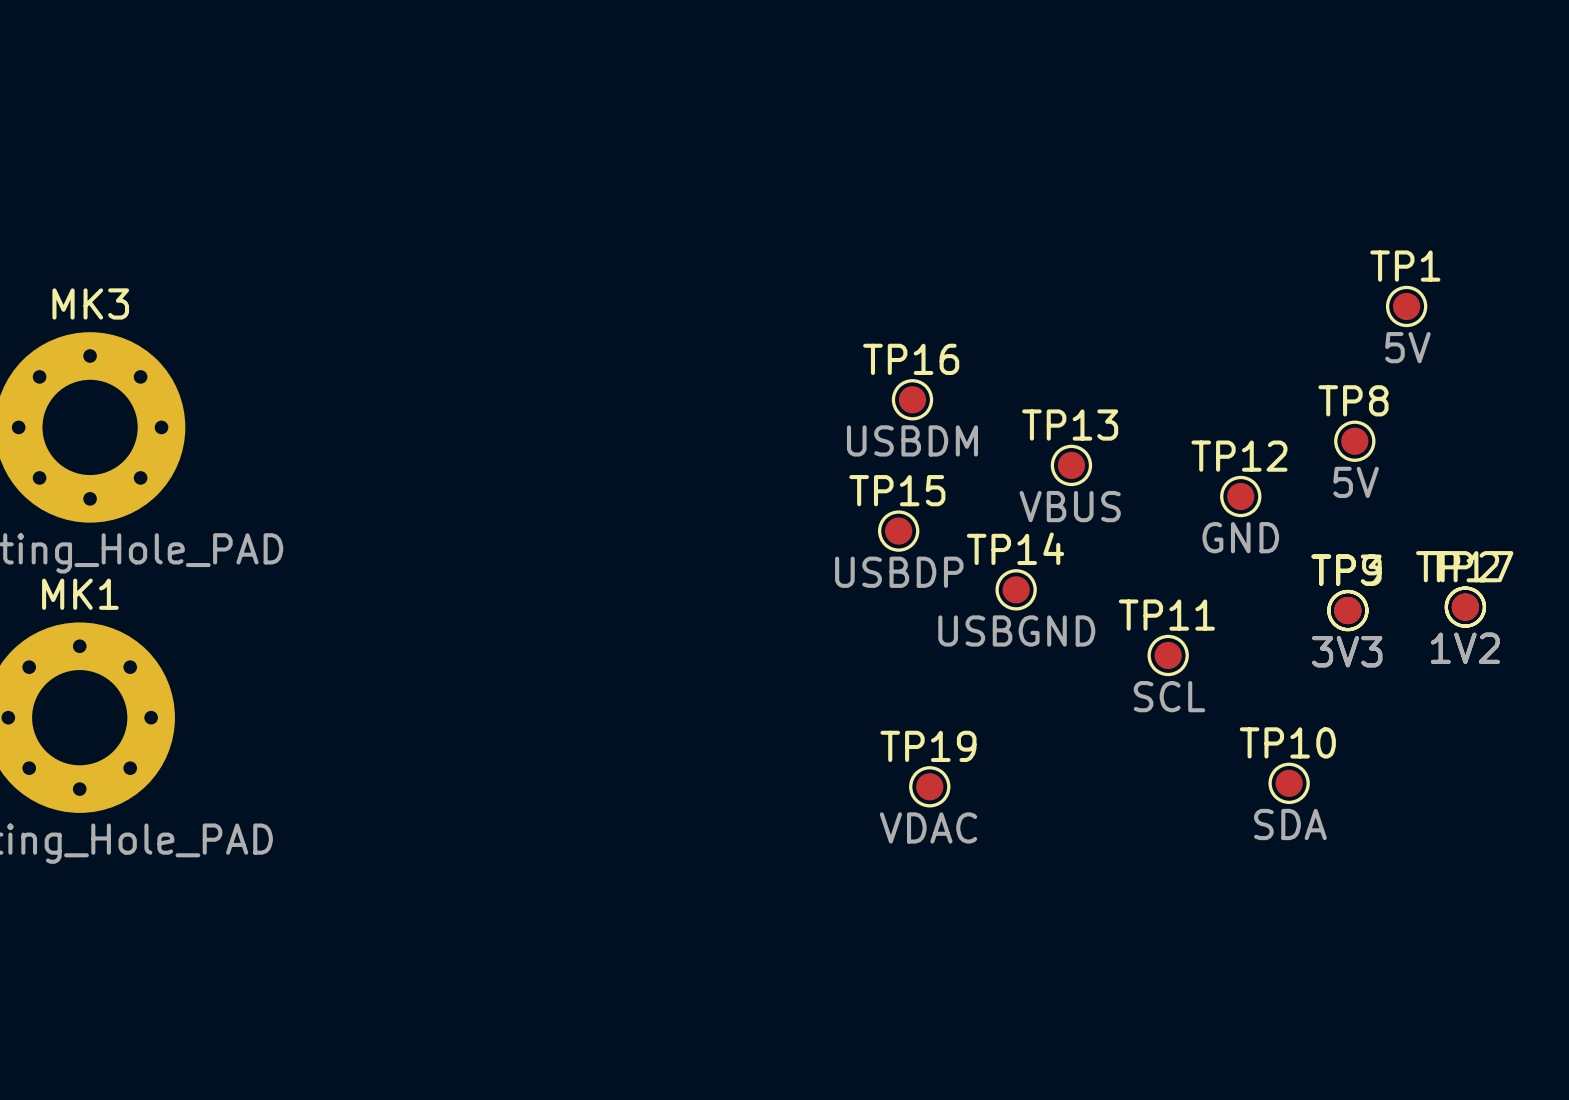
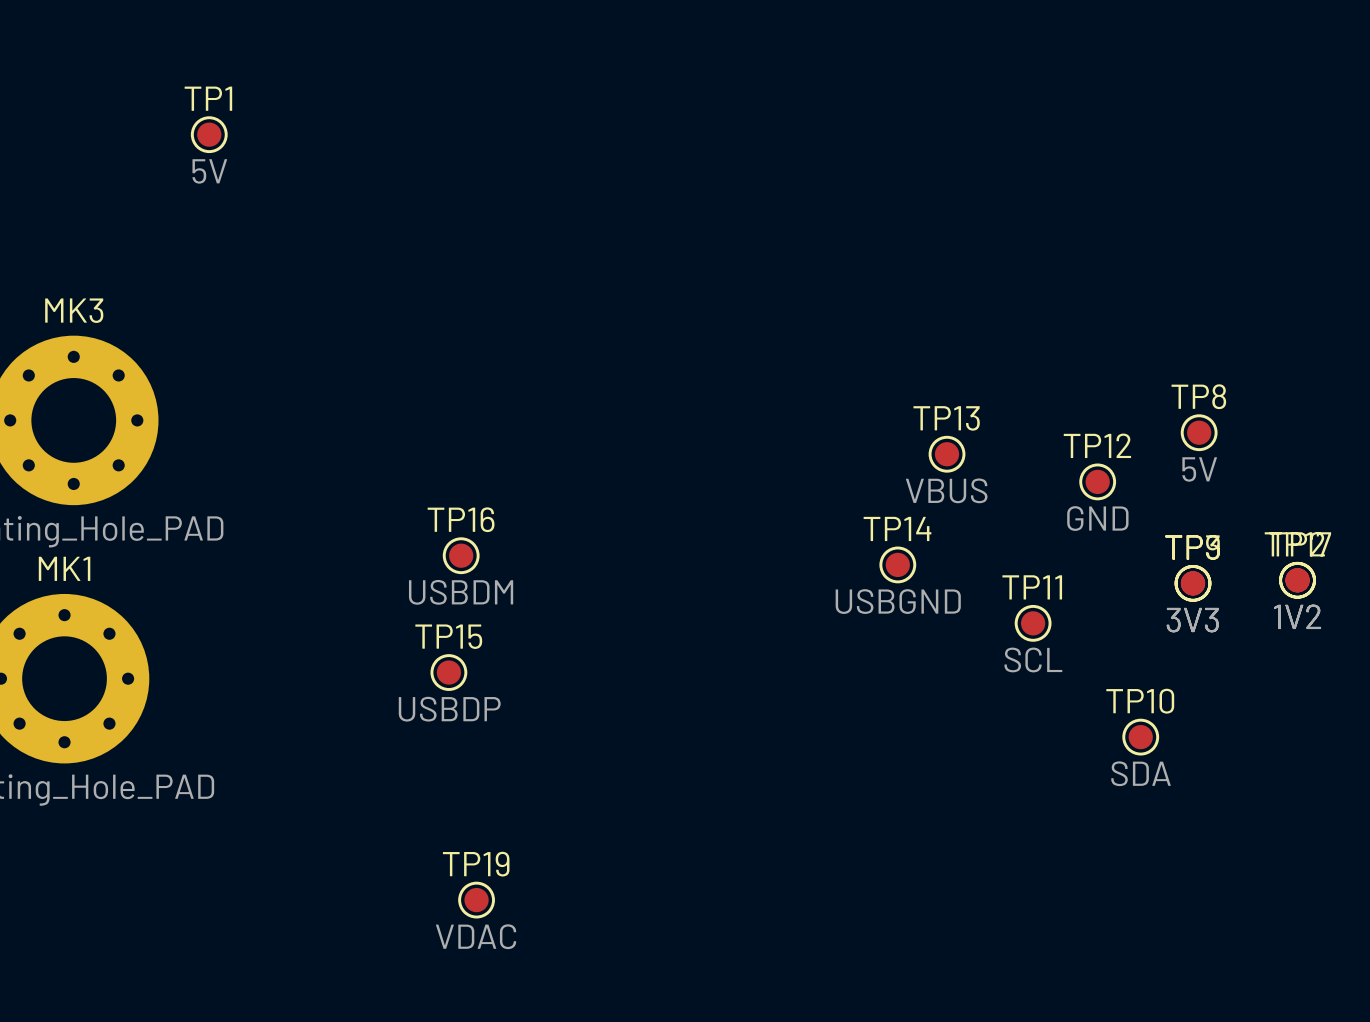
TP1 position: (1406, 306) -> (209, 134)
TP16 position: (912, 399) -> (461, 555)
TP15 position: (898, 531) -> (448, 672)
TP19 position: (929, 786) -> (476, 900)

